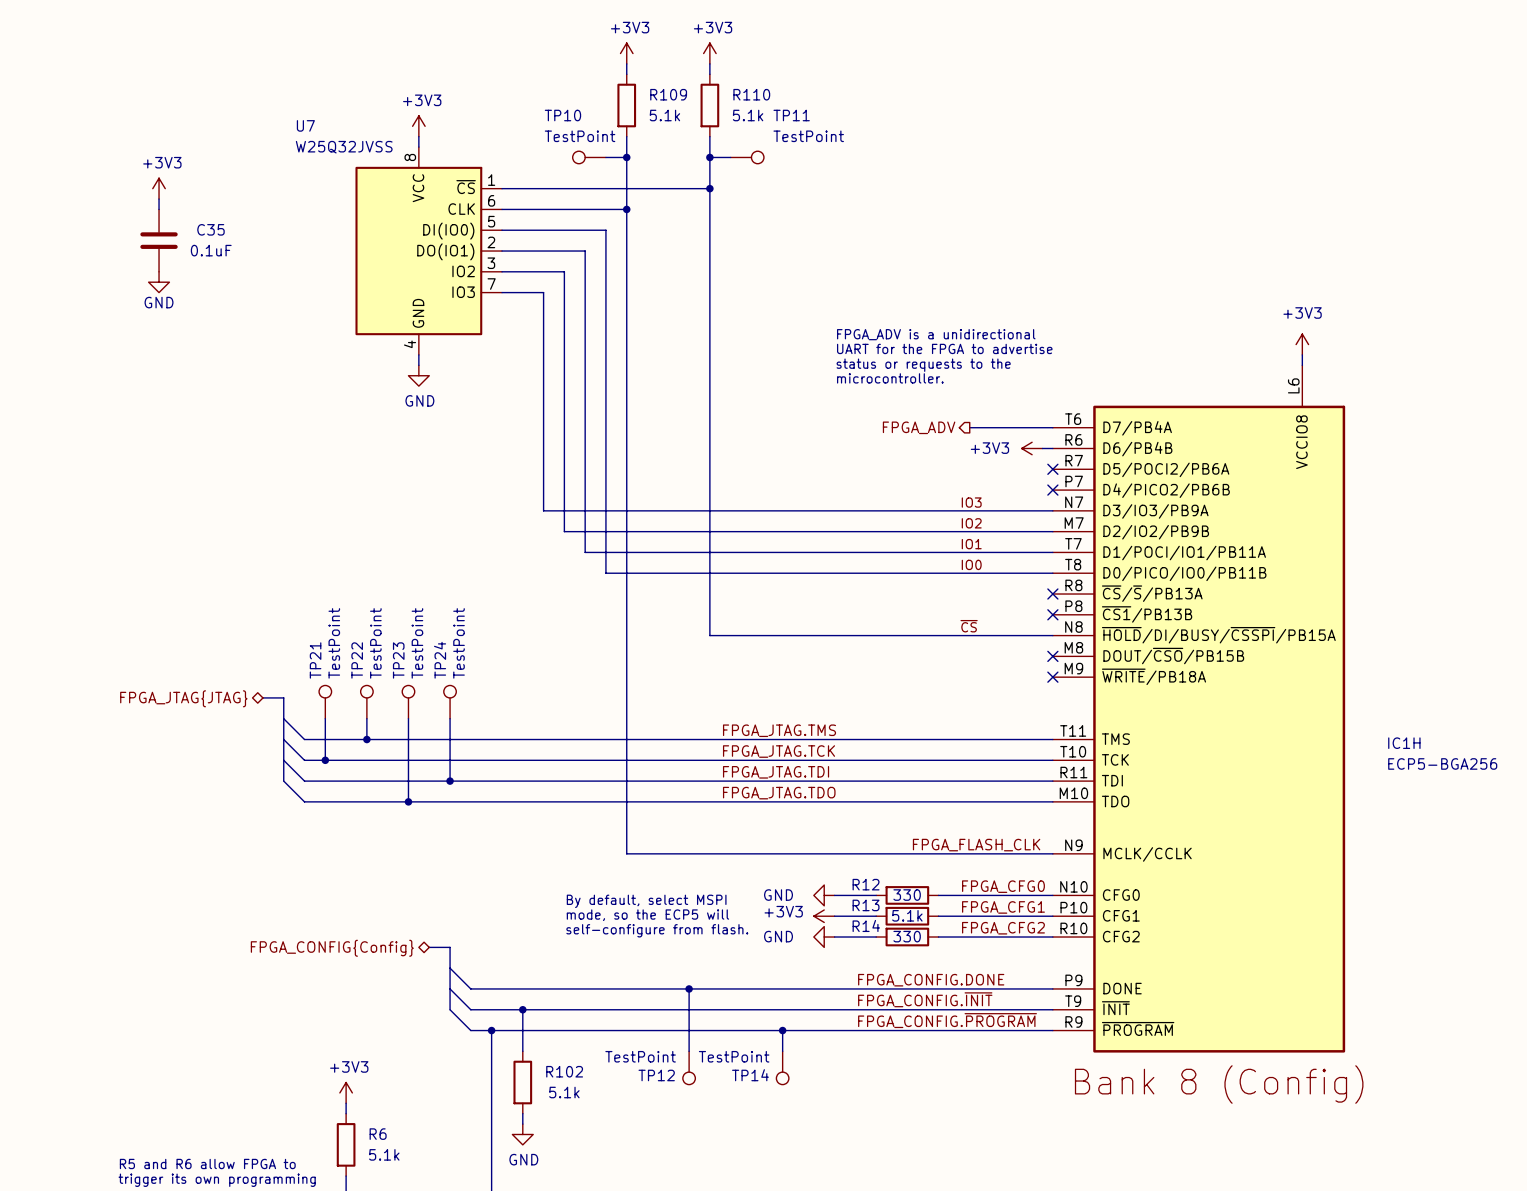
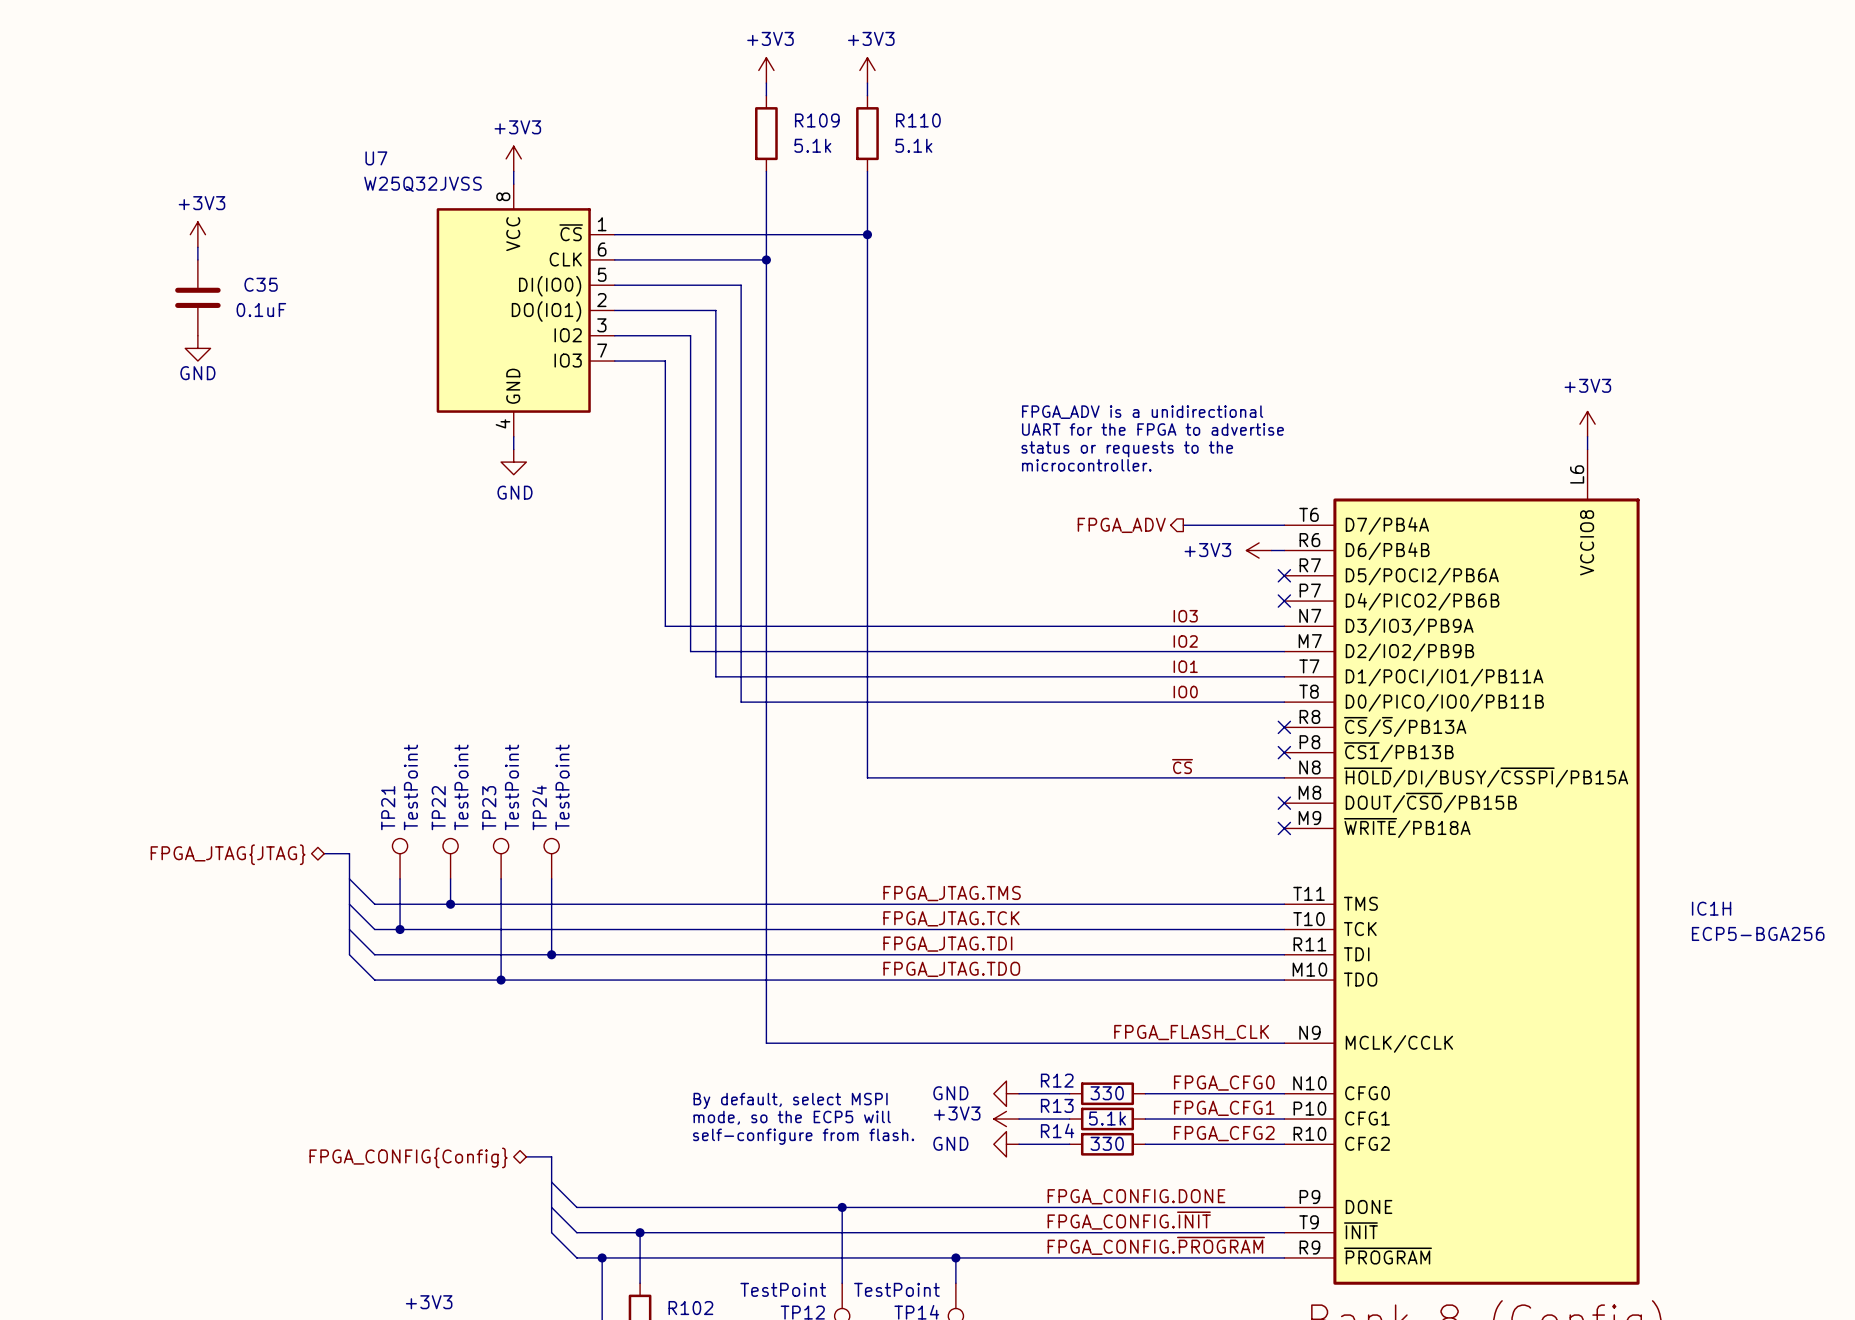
TP10: TestPoint (589, 157) -> none
wire: (605, 157) (626, 157) -> none
junction: (626, 157) -> none
wire: (709, 157) (730, 157) -> none
junction: (709, 157) -> none
TP11: TestPoint (747, 157) -> none

